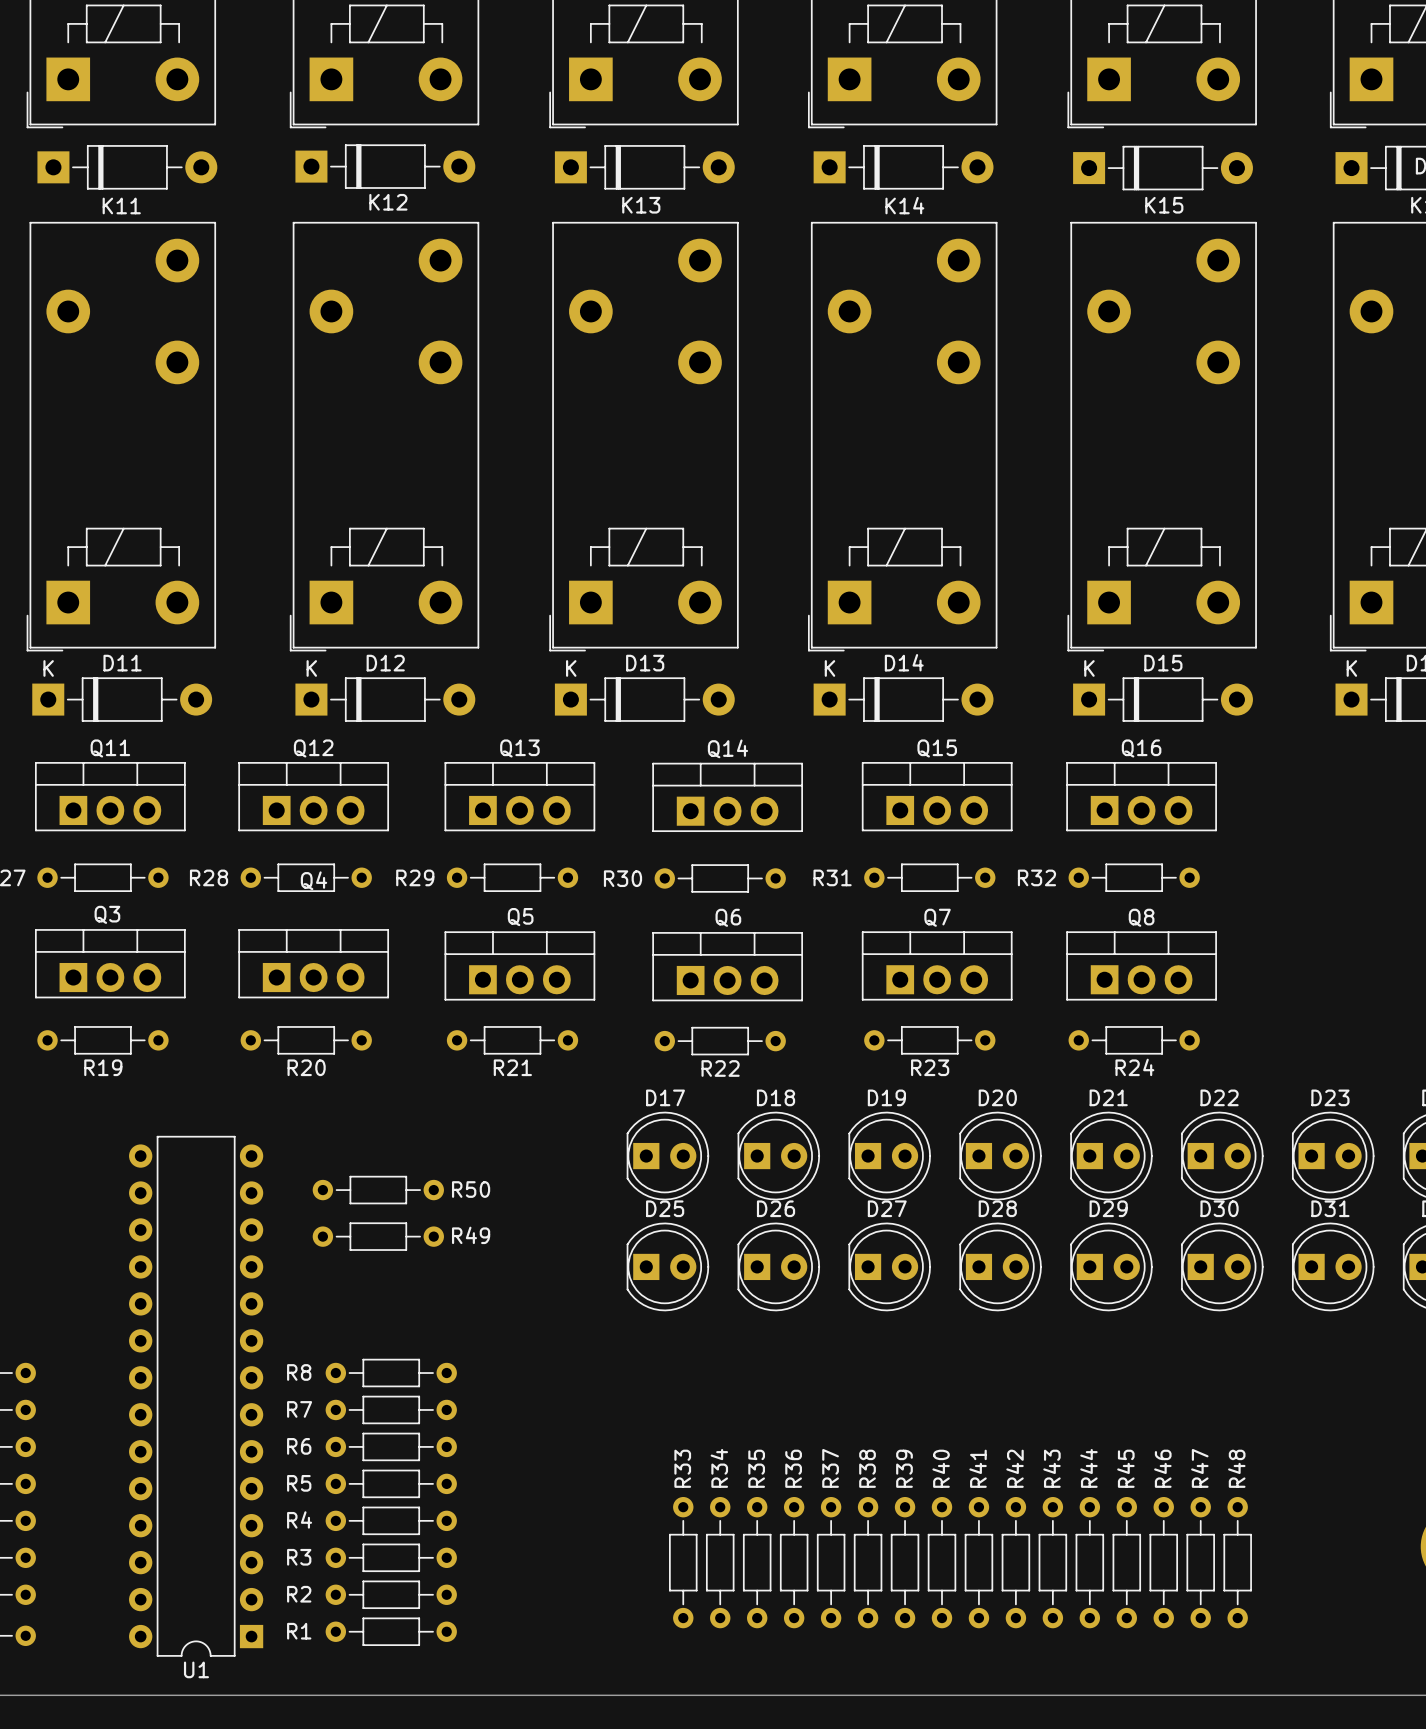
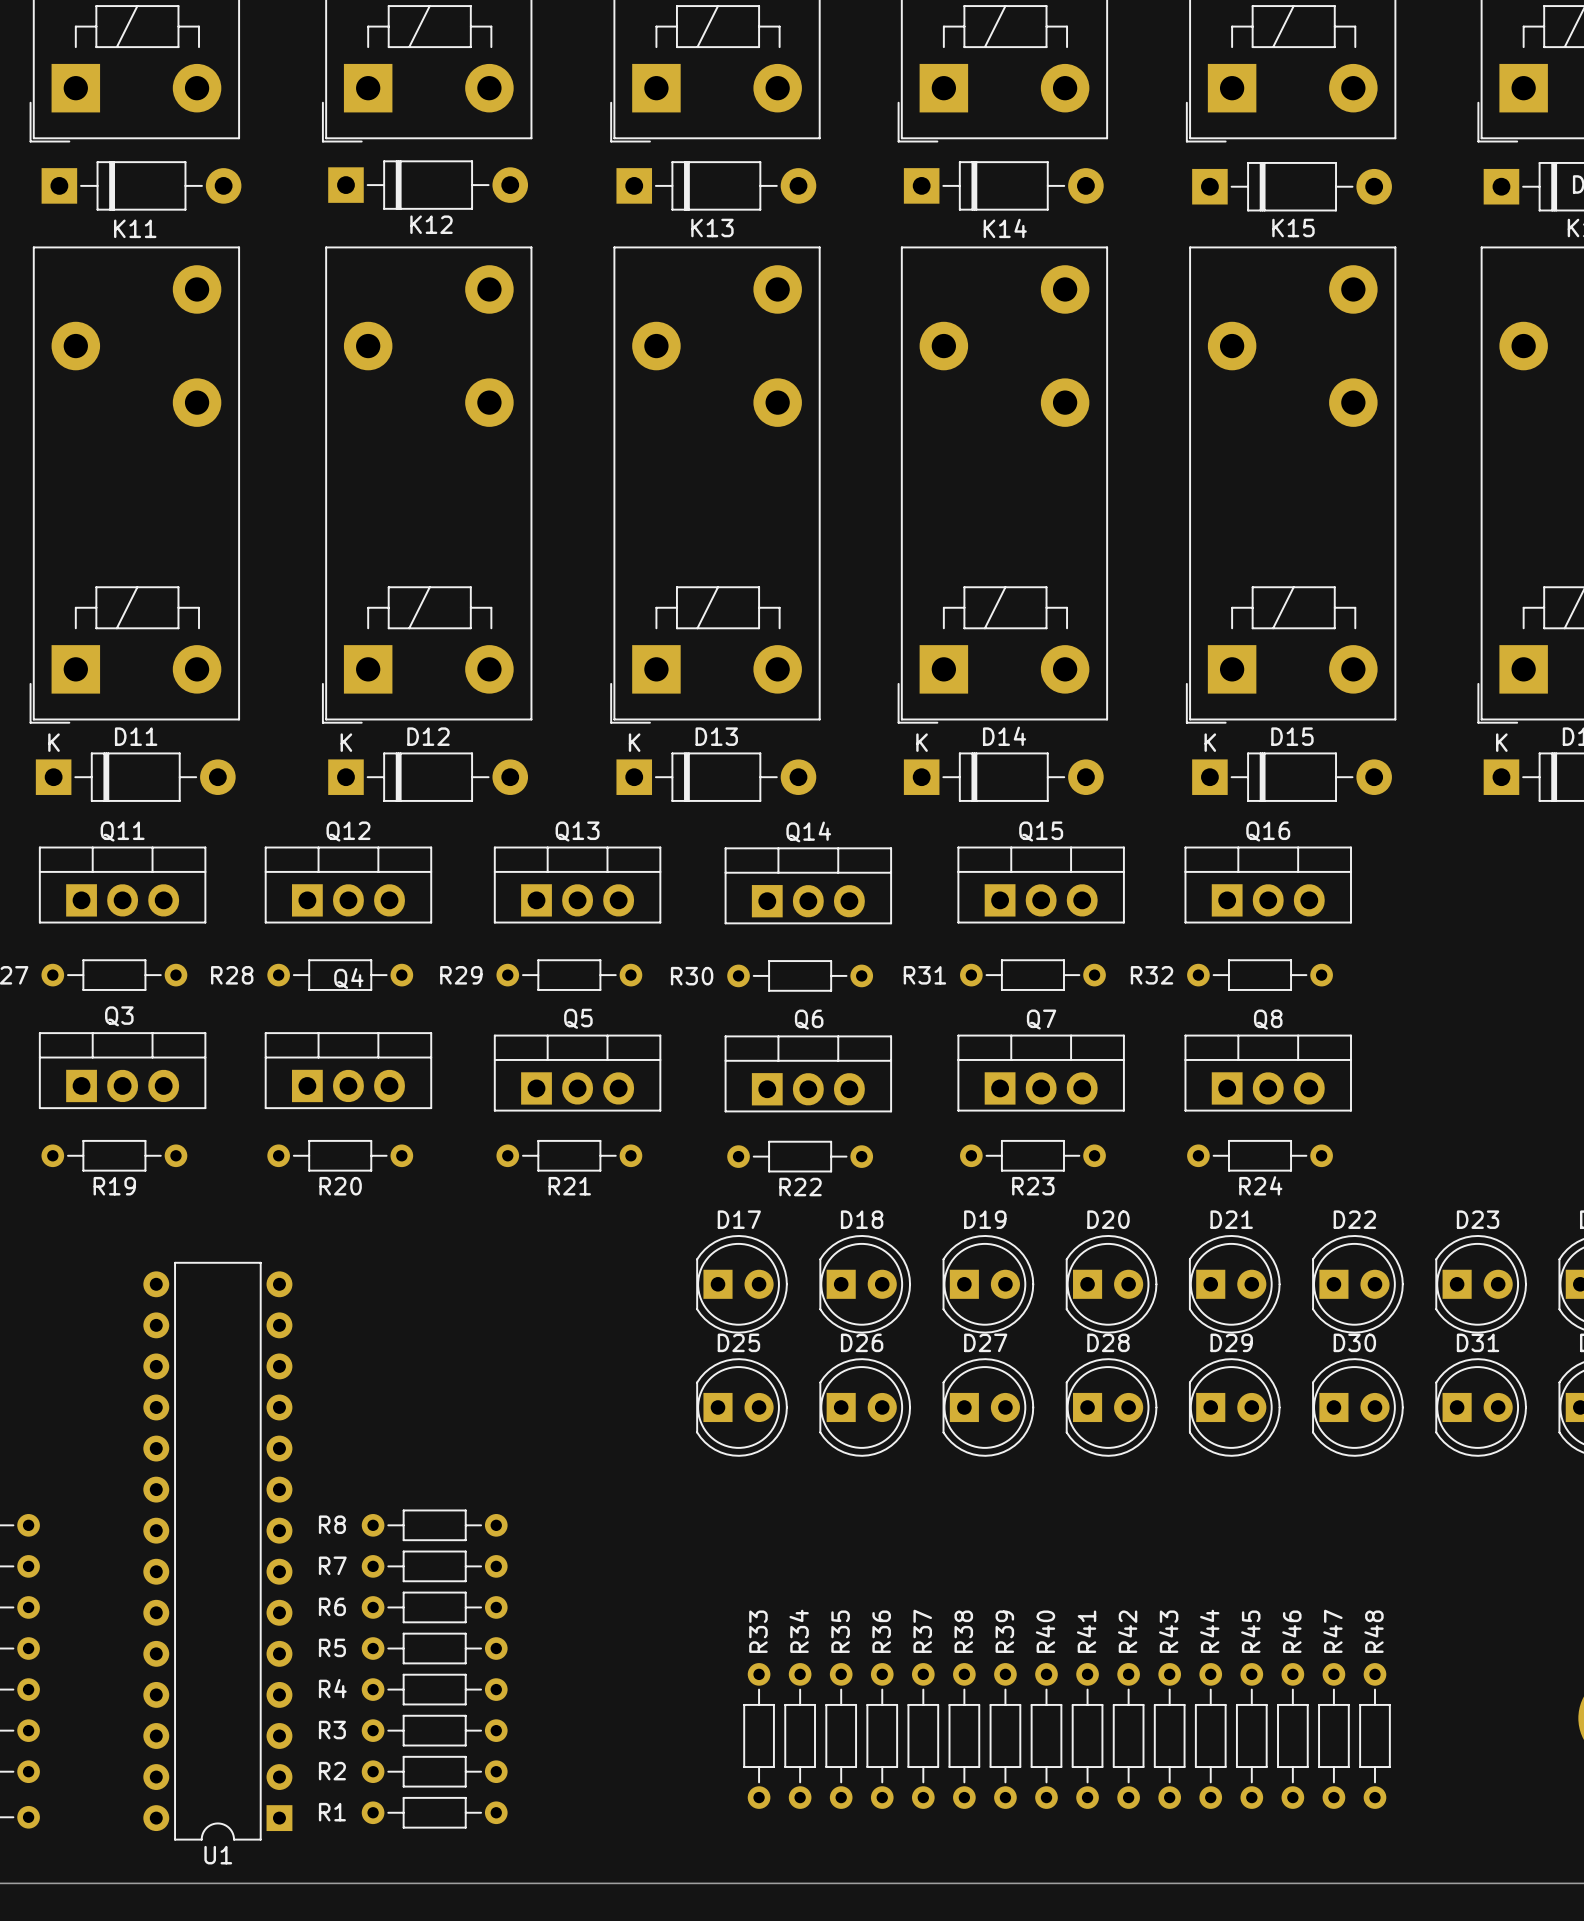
R50: (378, 1190) -> none
R49: (378, 1236) -> none

